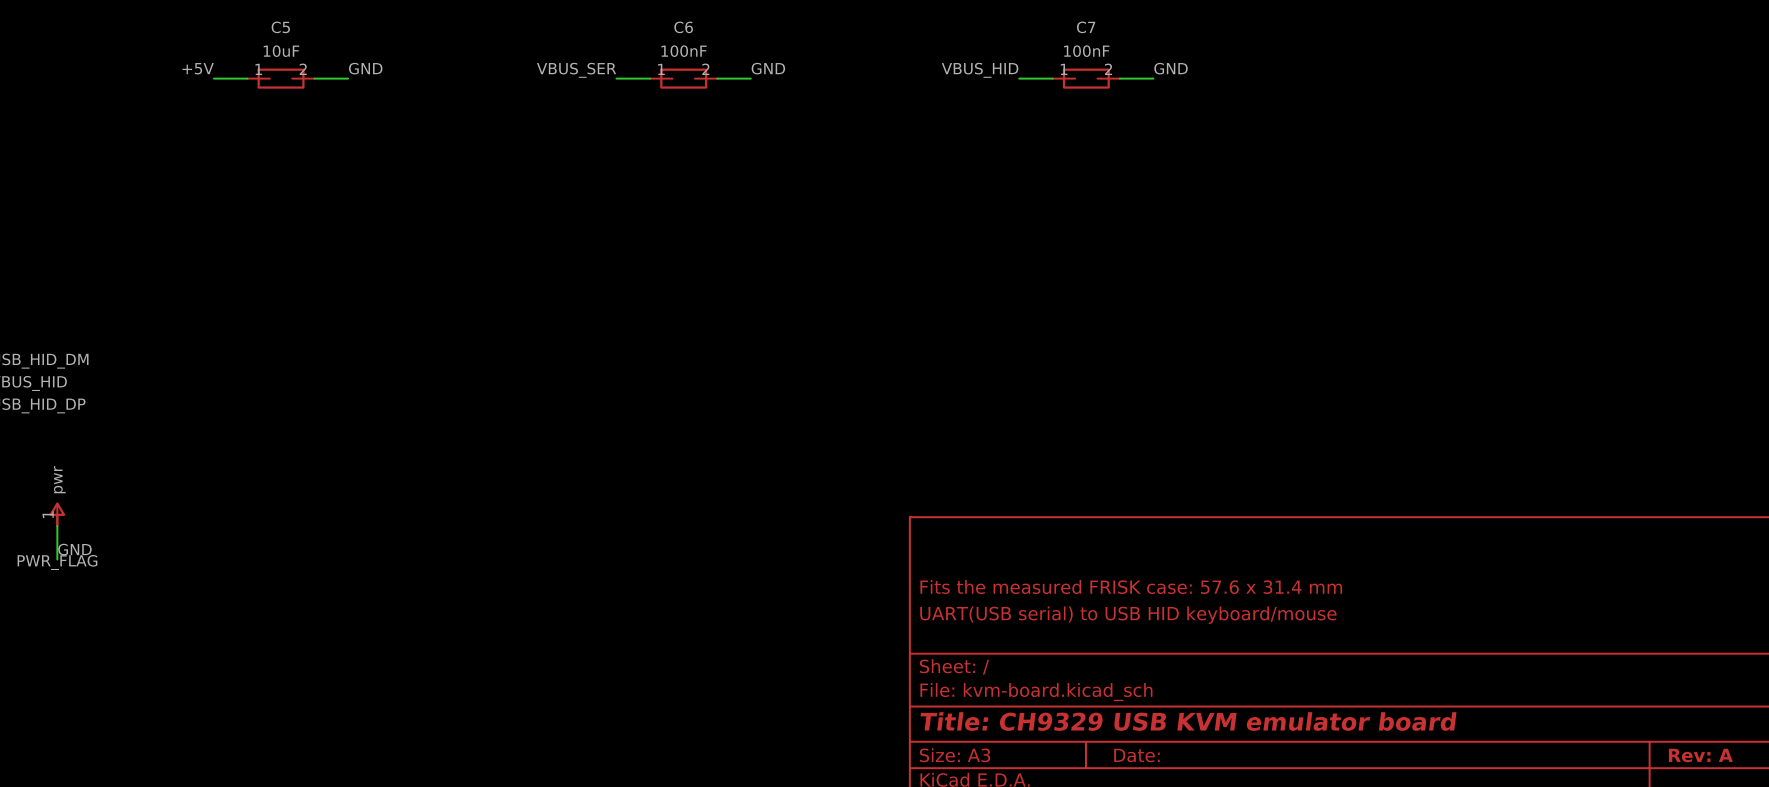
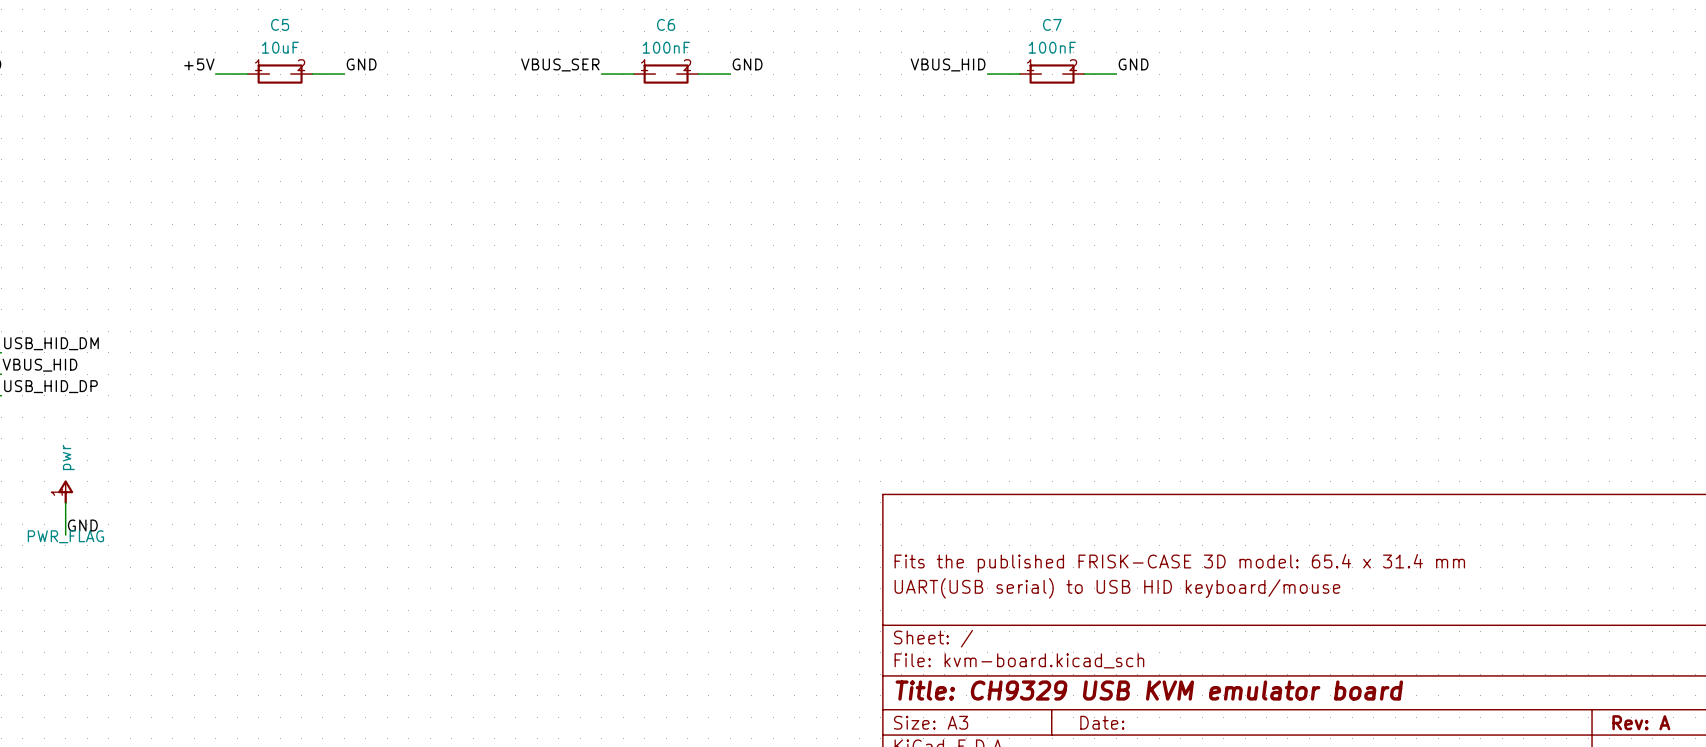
title block: Fits the measured FRISK case: 57.6 x 31.4 mm (1131, 586) -> Fits the published FRISK-CASE 3D model: 65.4 x 31.4 mm (1179, 563)

